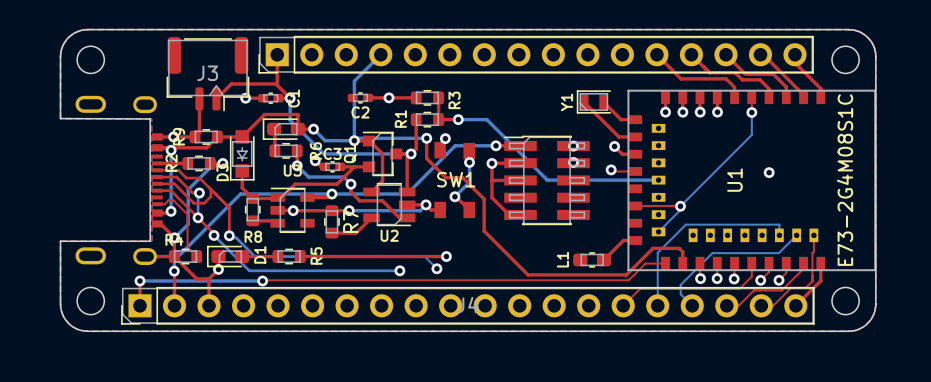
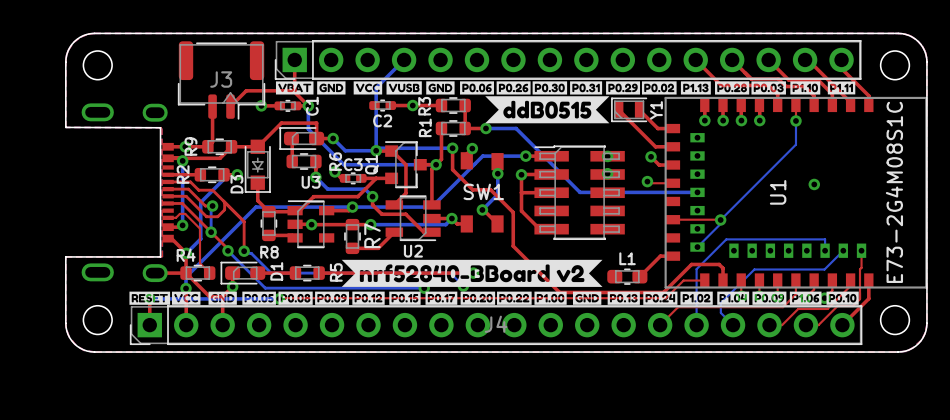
drawing: none -> [275, 81, 856, 124]
R3 name position: R3 (454, 100) -> R3 (424, 106)
Y1 name position: Y1 (566, 102) -> Y1 (656, 110)
drawing: none -> [129, 259, 859, 305]
L1 name rotation: 0° (562, 259) -> 90° clockwise (627, 258)
L1 name position: L1 (562, 259) -> L1 (627, 258)

